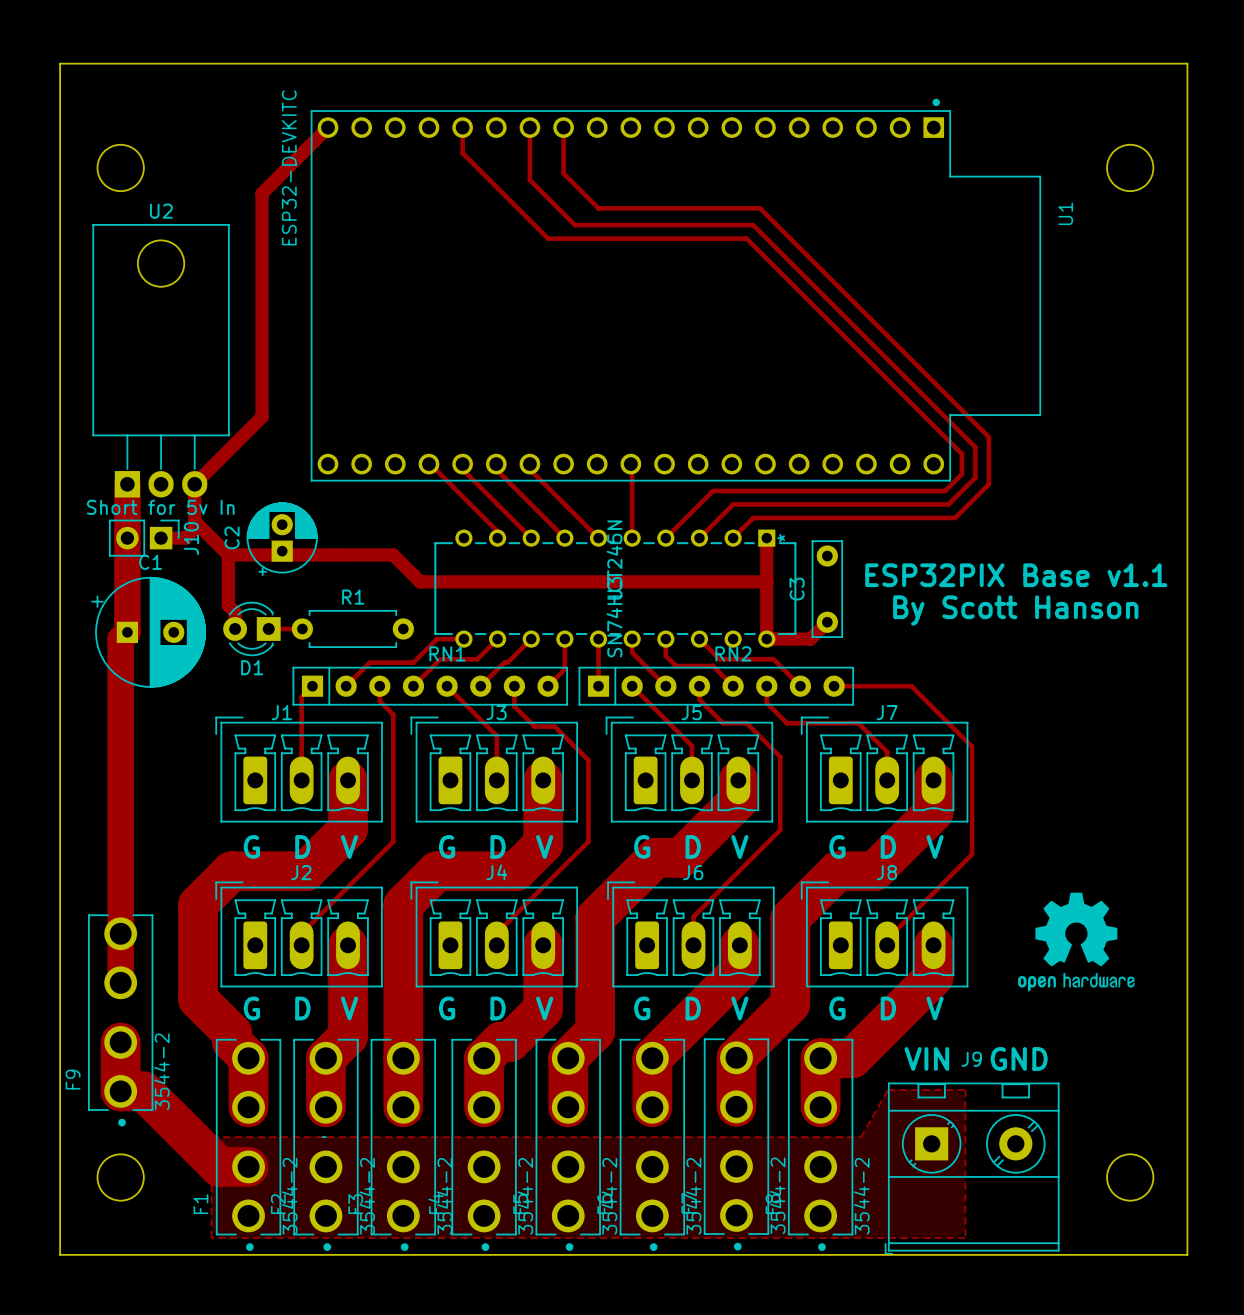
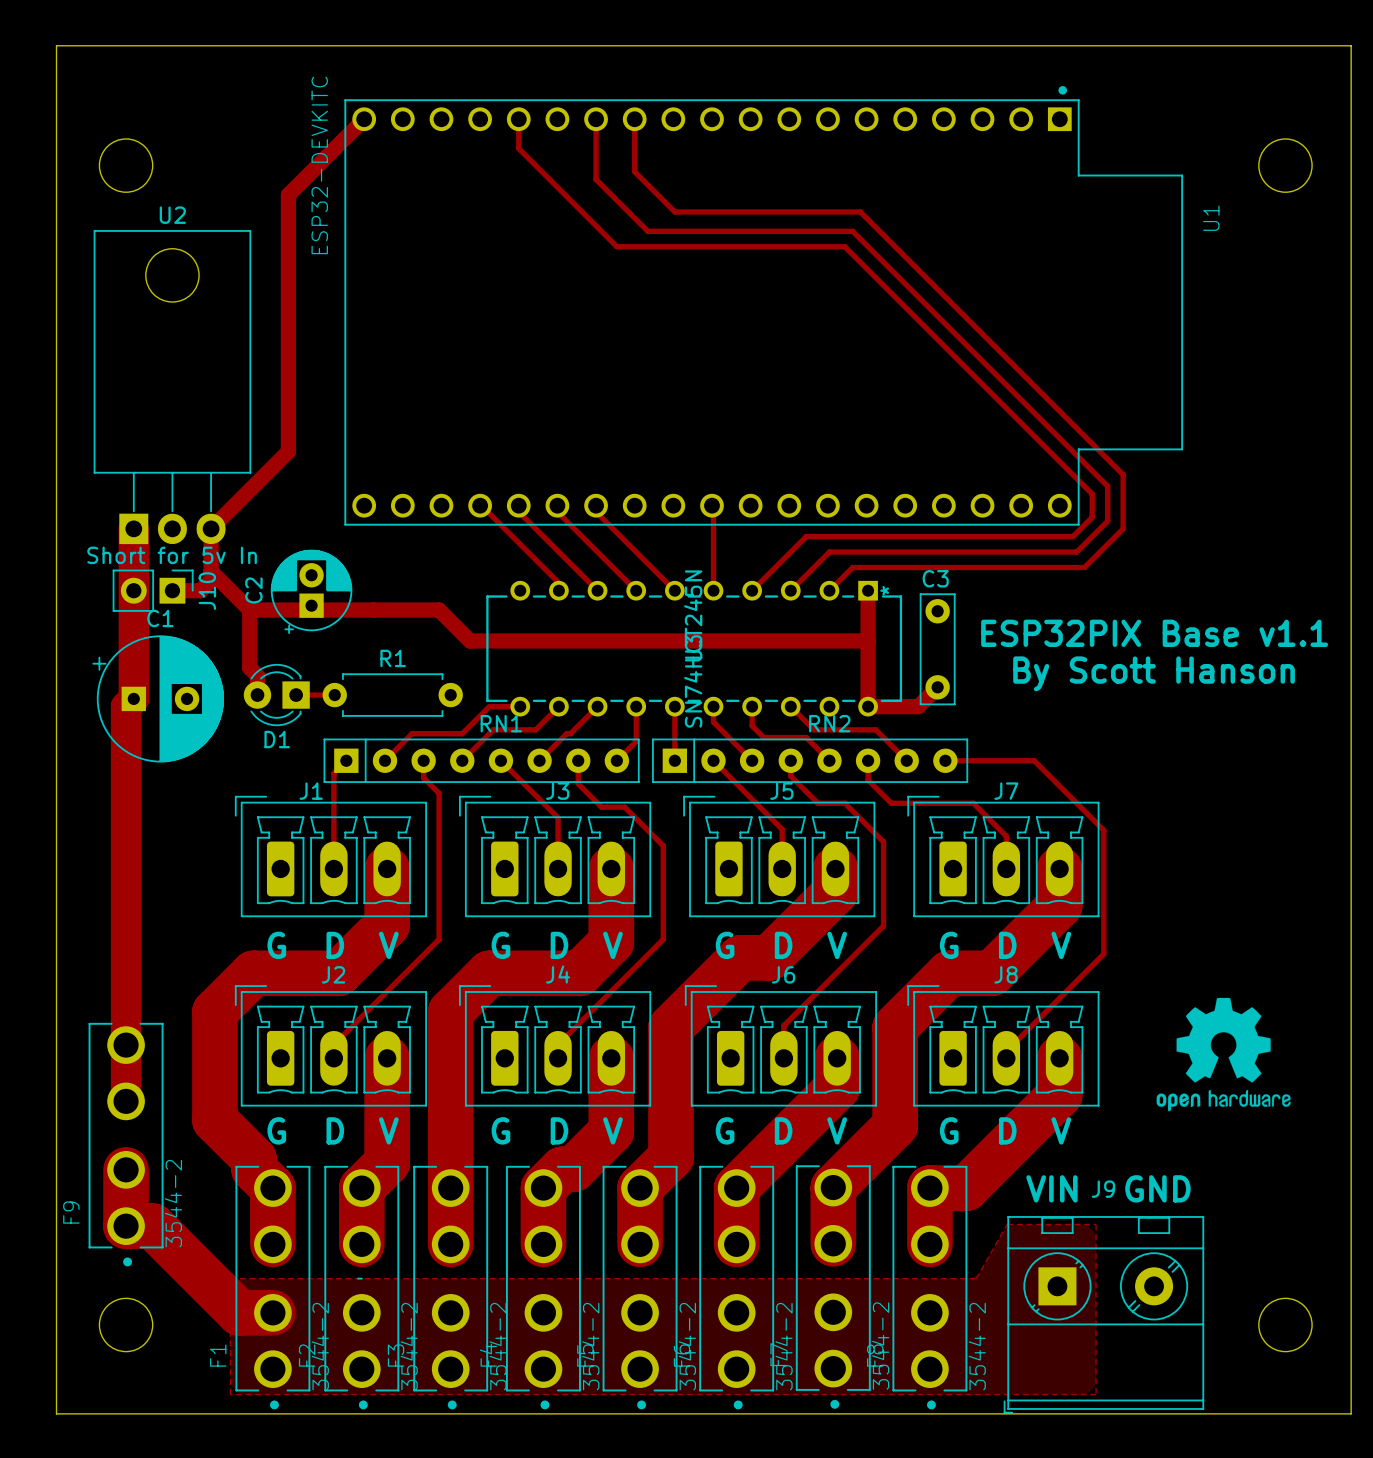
C3 name rotation: 0° (797, 589) -> 90° clockwise (935, 578)
C3 name position: C3 (797, 589) -> C3 (935, 578)

